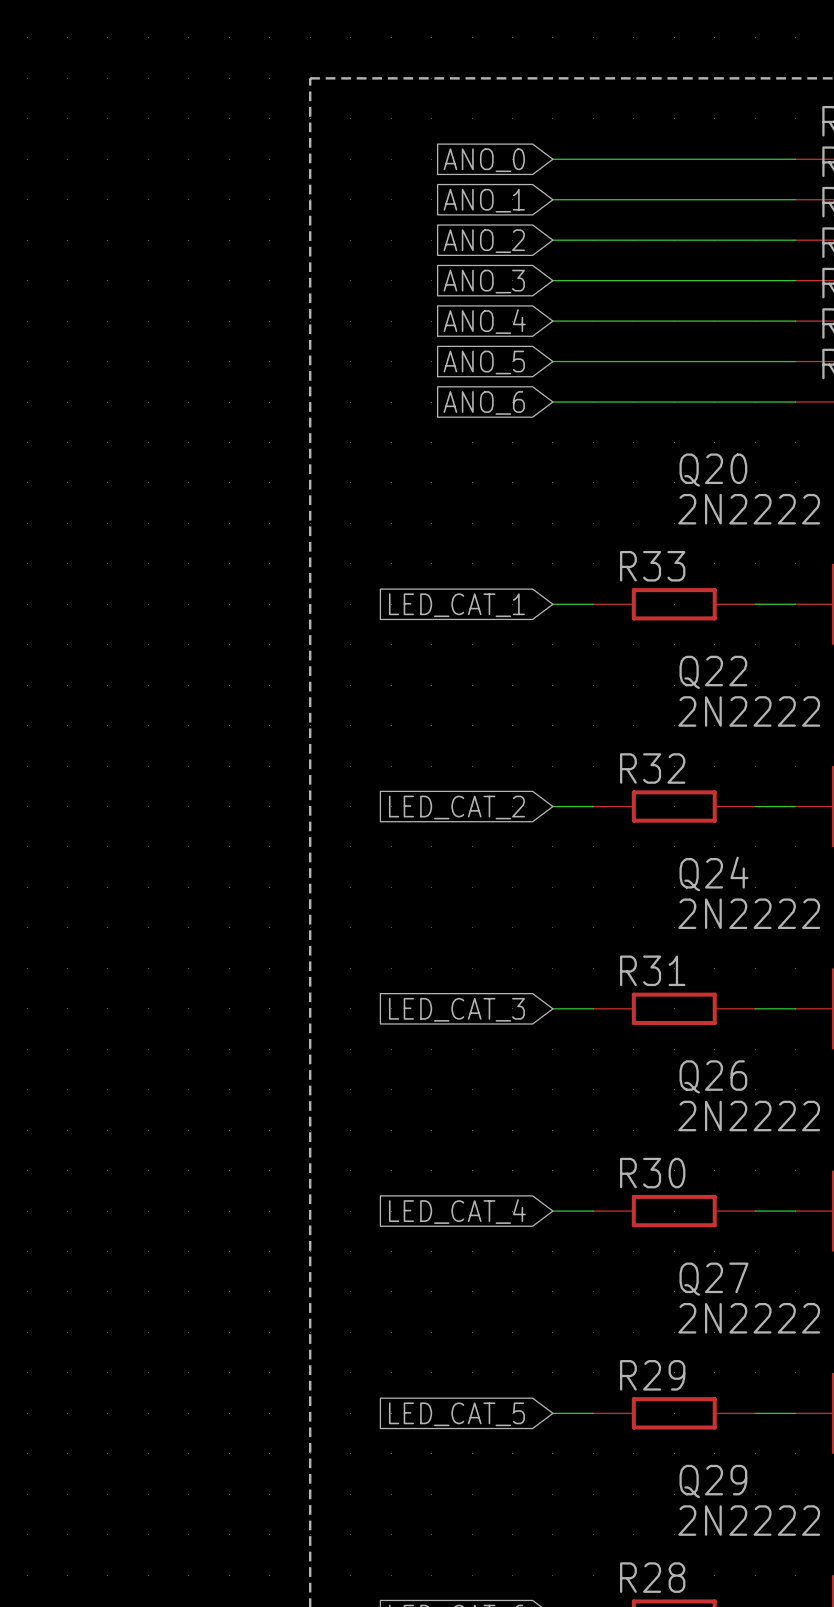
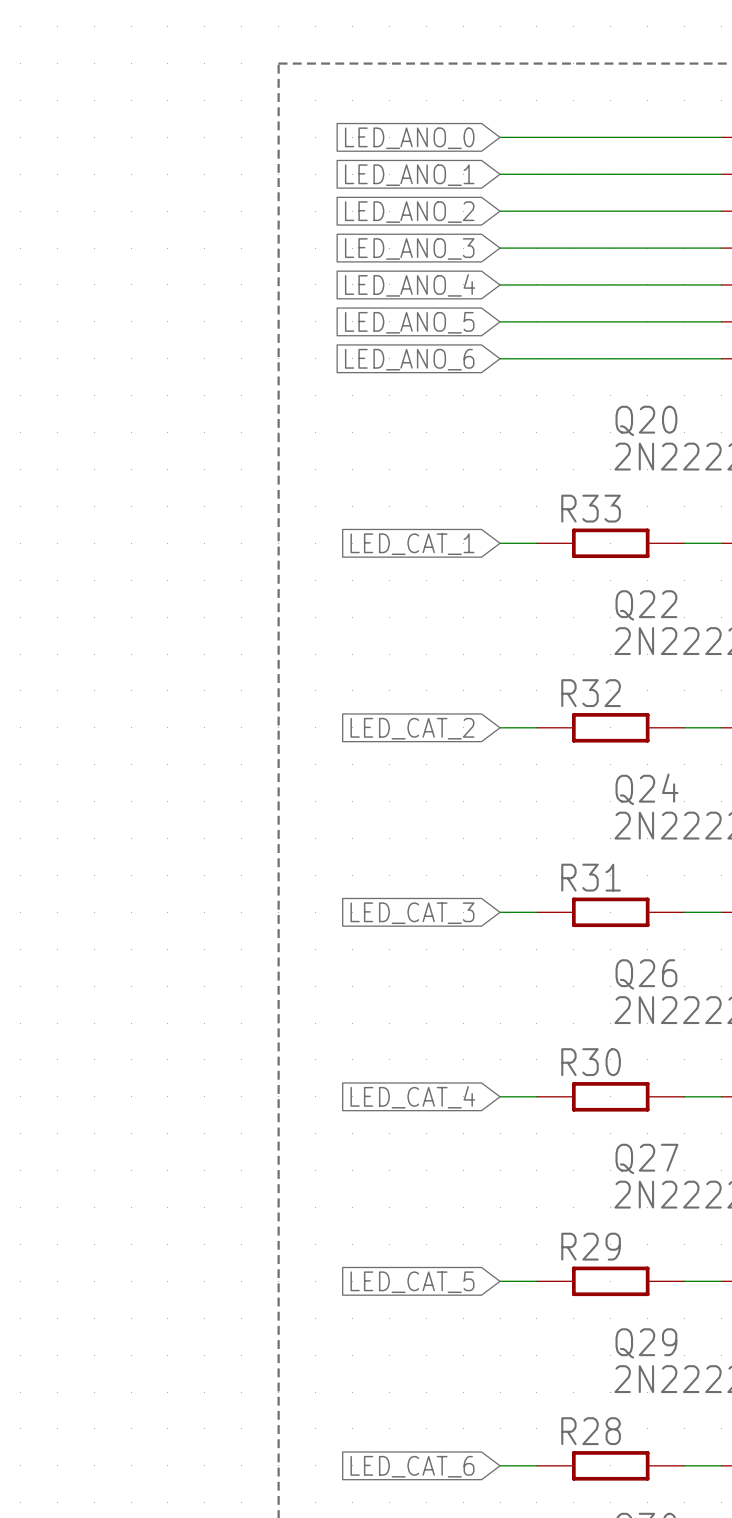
global label: ANO_0 (484, 160) -> LED_ANO_0 (409, 138)
global label: ANO_1 (484, 200) -> LED_ANO_1 (409, 175)
global label: ANO_2 (484, 241) -> LED_ANO_2 (409, 212)
global label: ANO_3 (484, 281) -> LED_ANO_3 (409, 248)
global label: ANO_4 (484, 321) -> LED_ANO_4 (410, 285)
global label: ANO_5 (484, 362) -> LED_ANO_5 (409, 322)
global label: ANO_6 (484, 402) -> LED_ANO_6 (409, 359)

